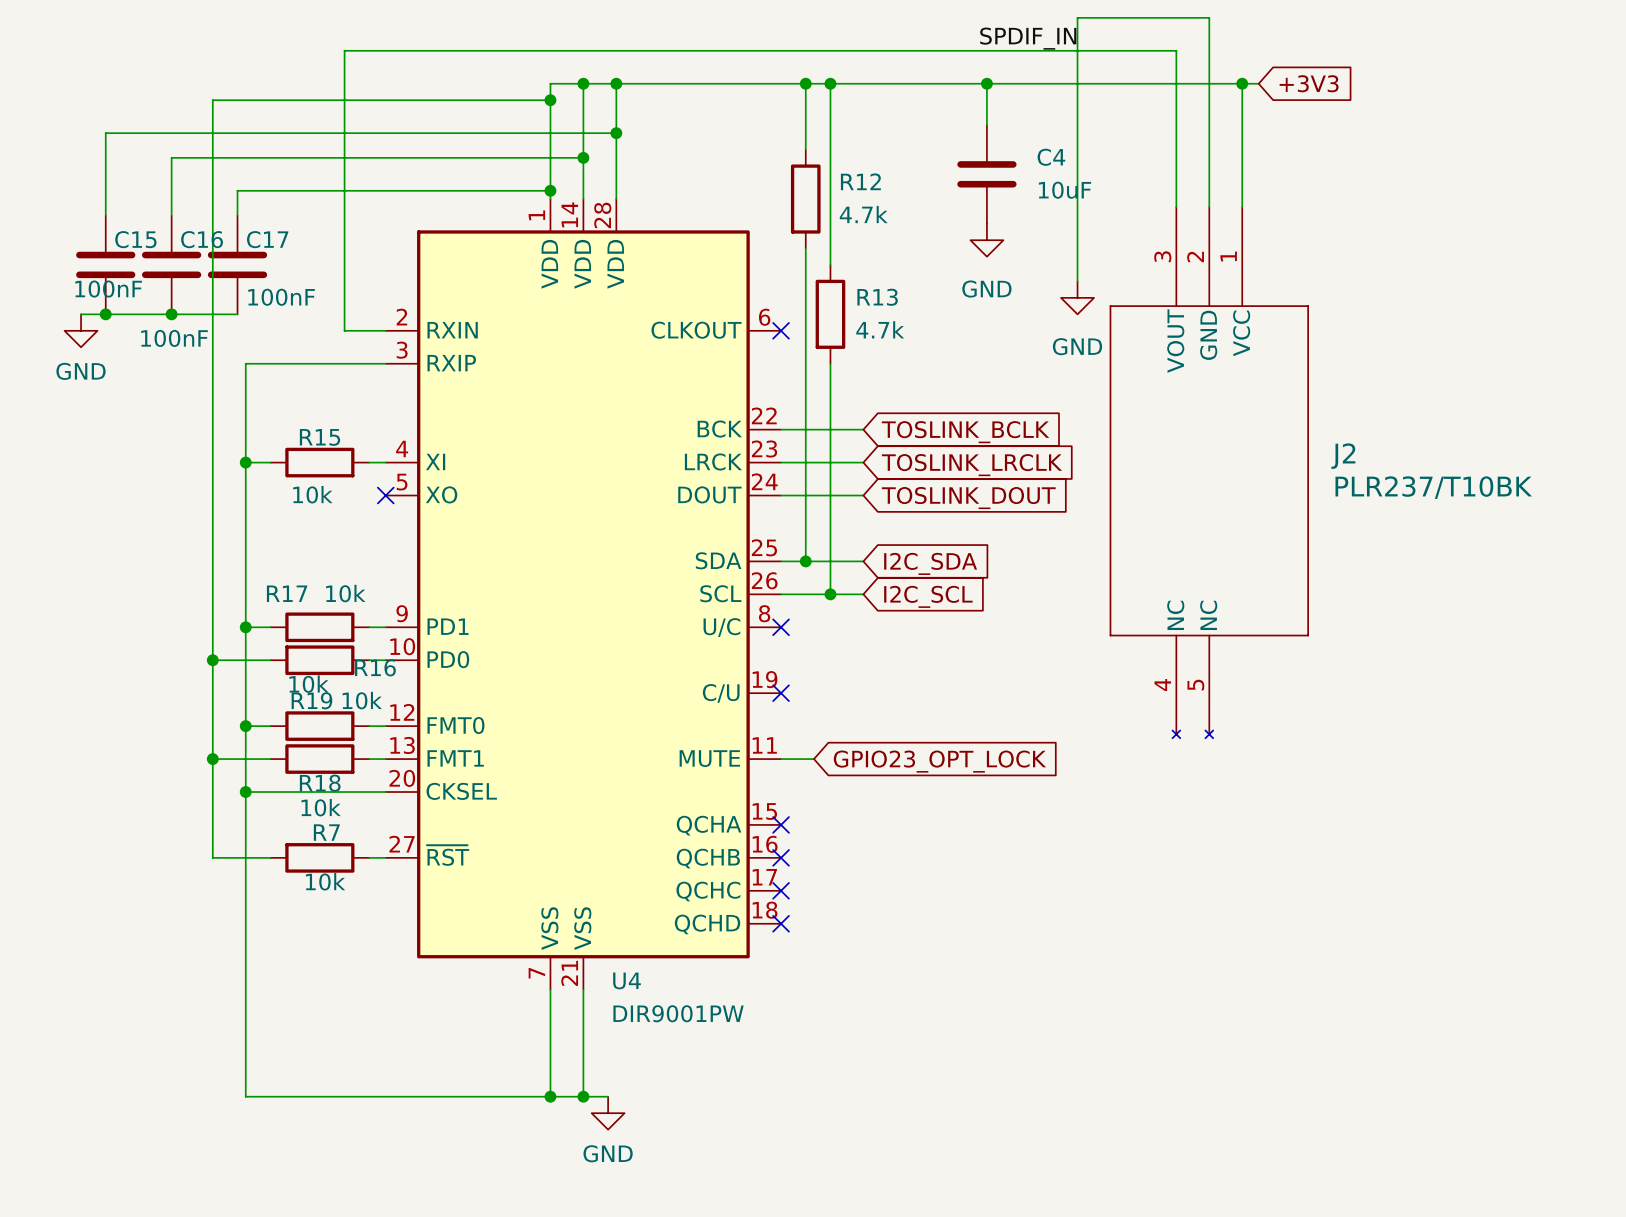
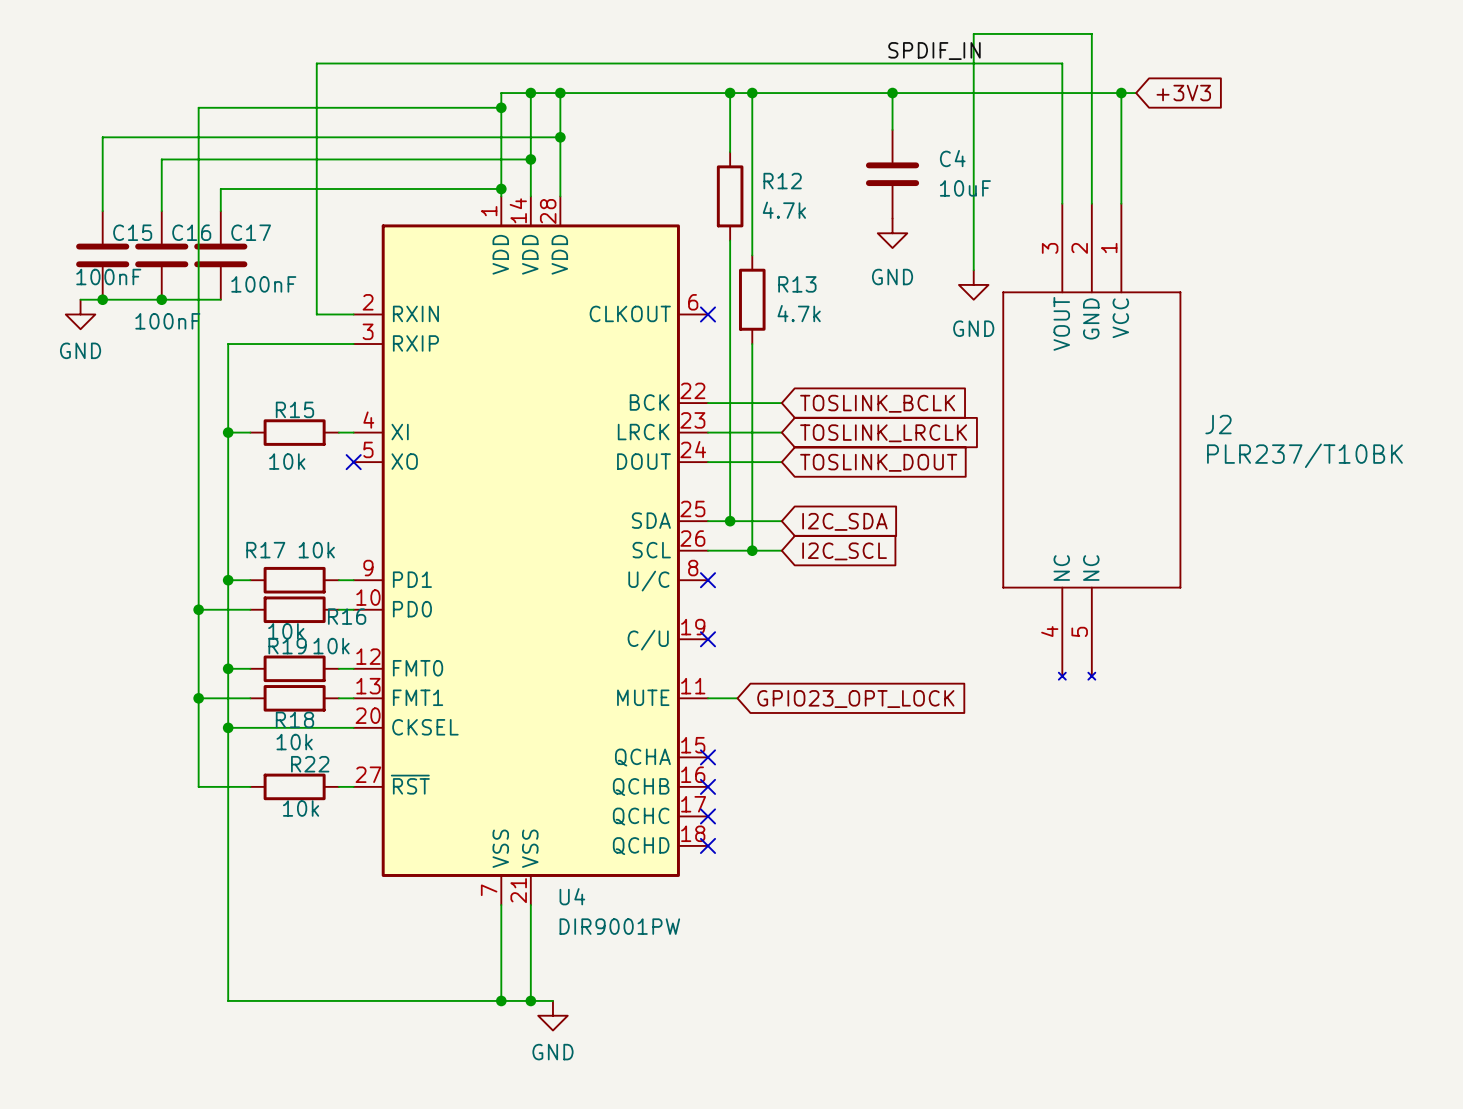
R7 name: R7 (326, 832) -> R22 (310, 764)

